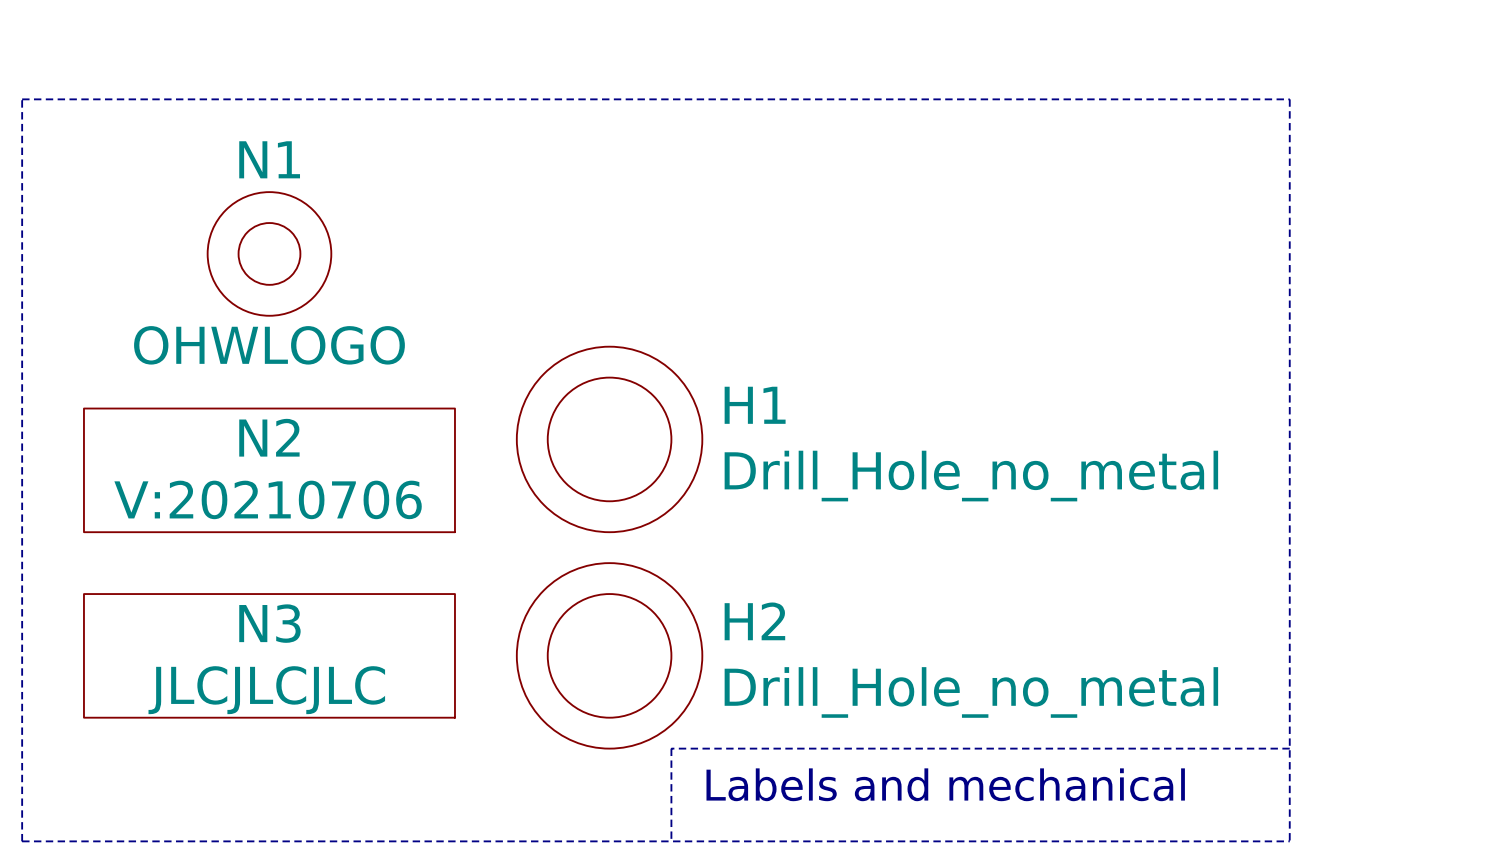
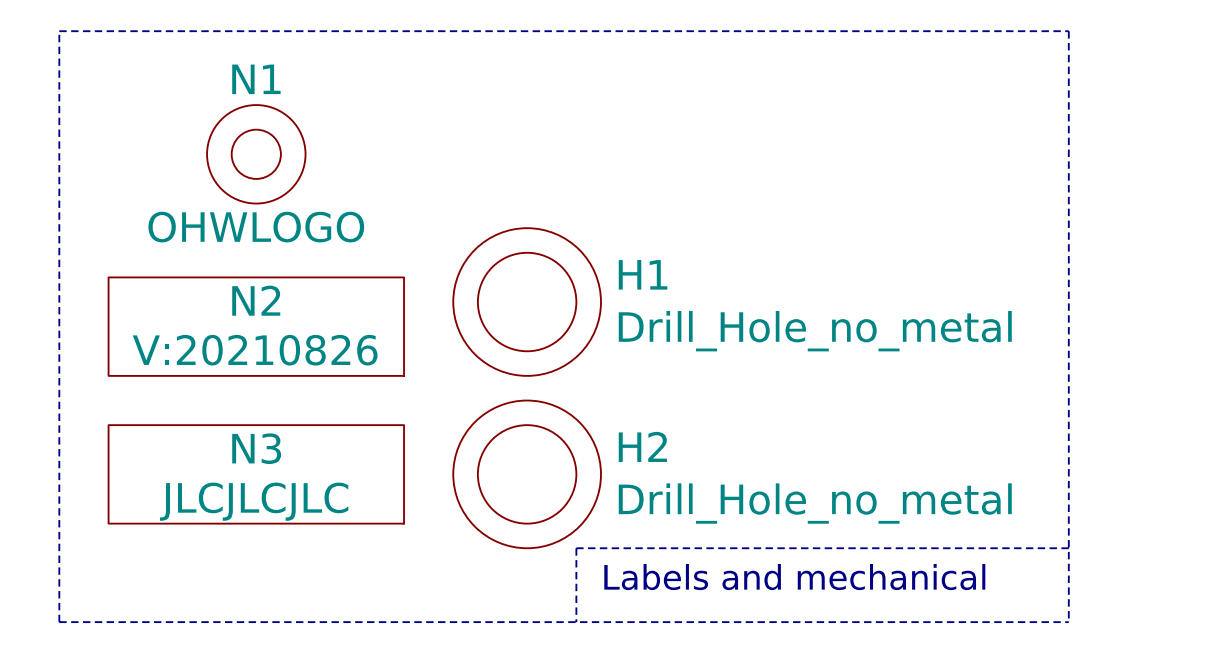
N2 value: V:20210706 (268, 499) -> V:20210826 (255, 350)

